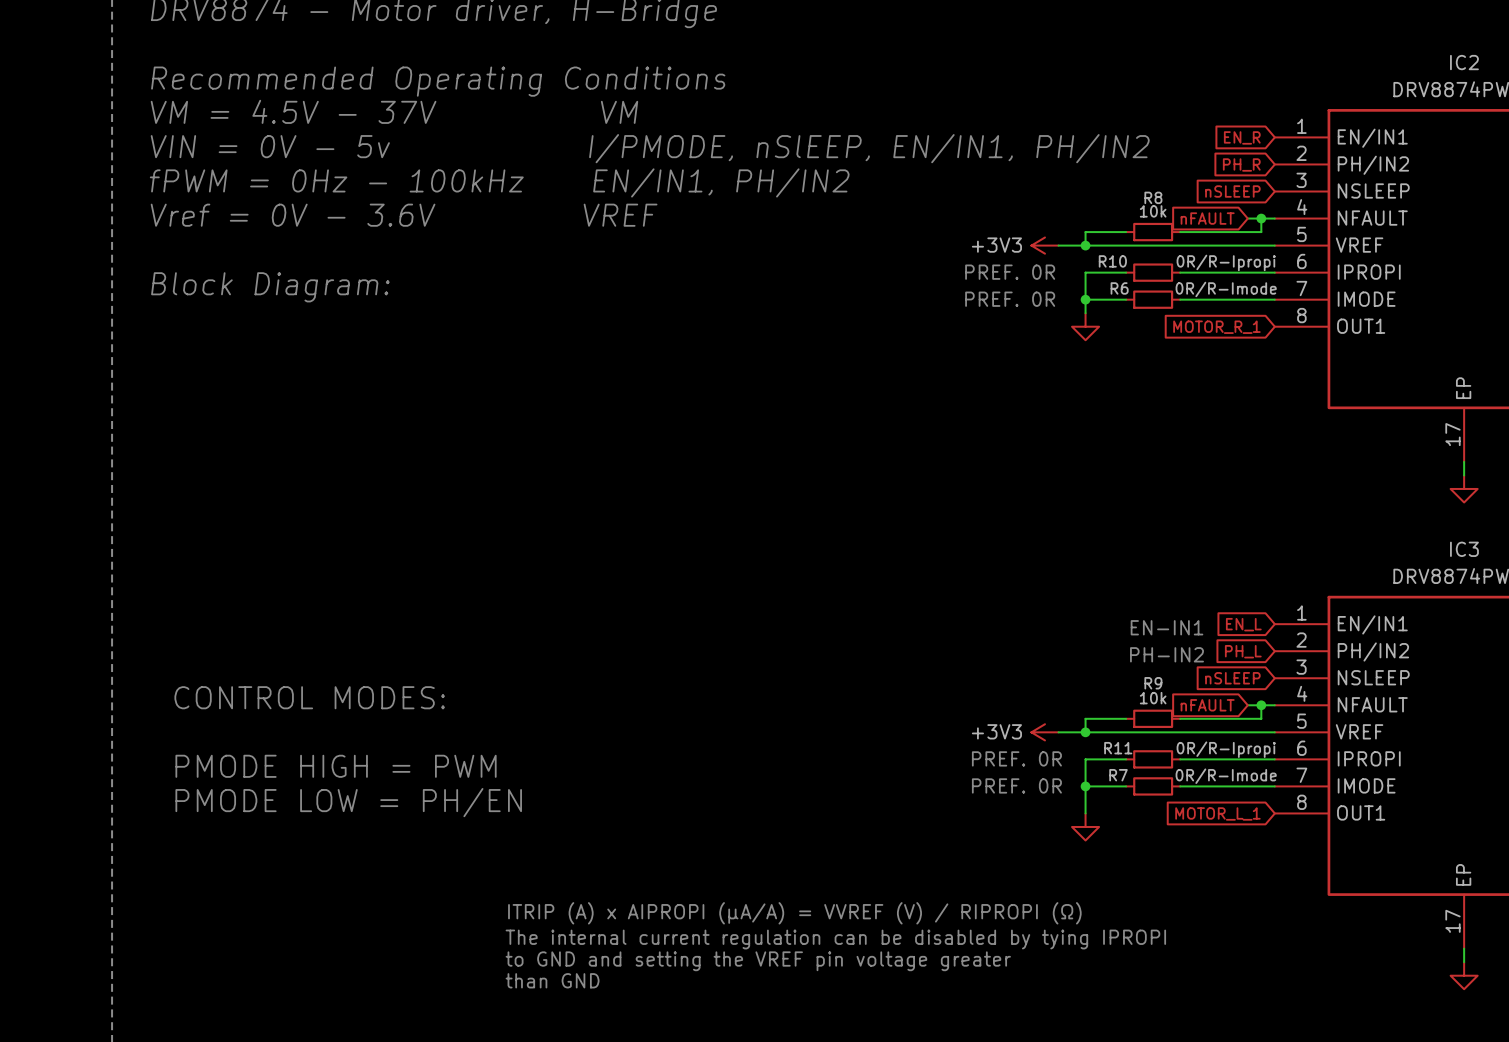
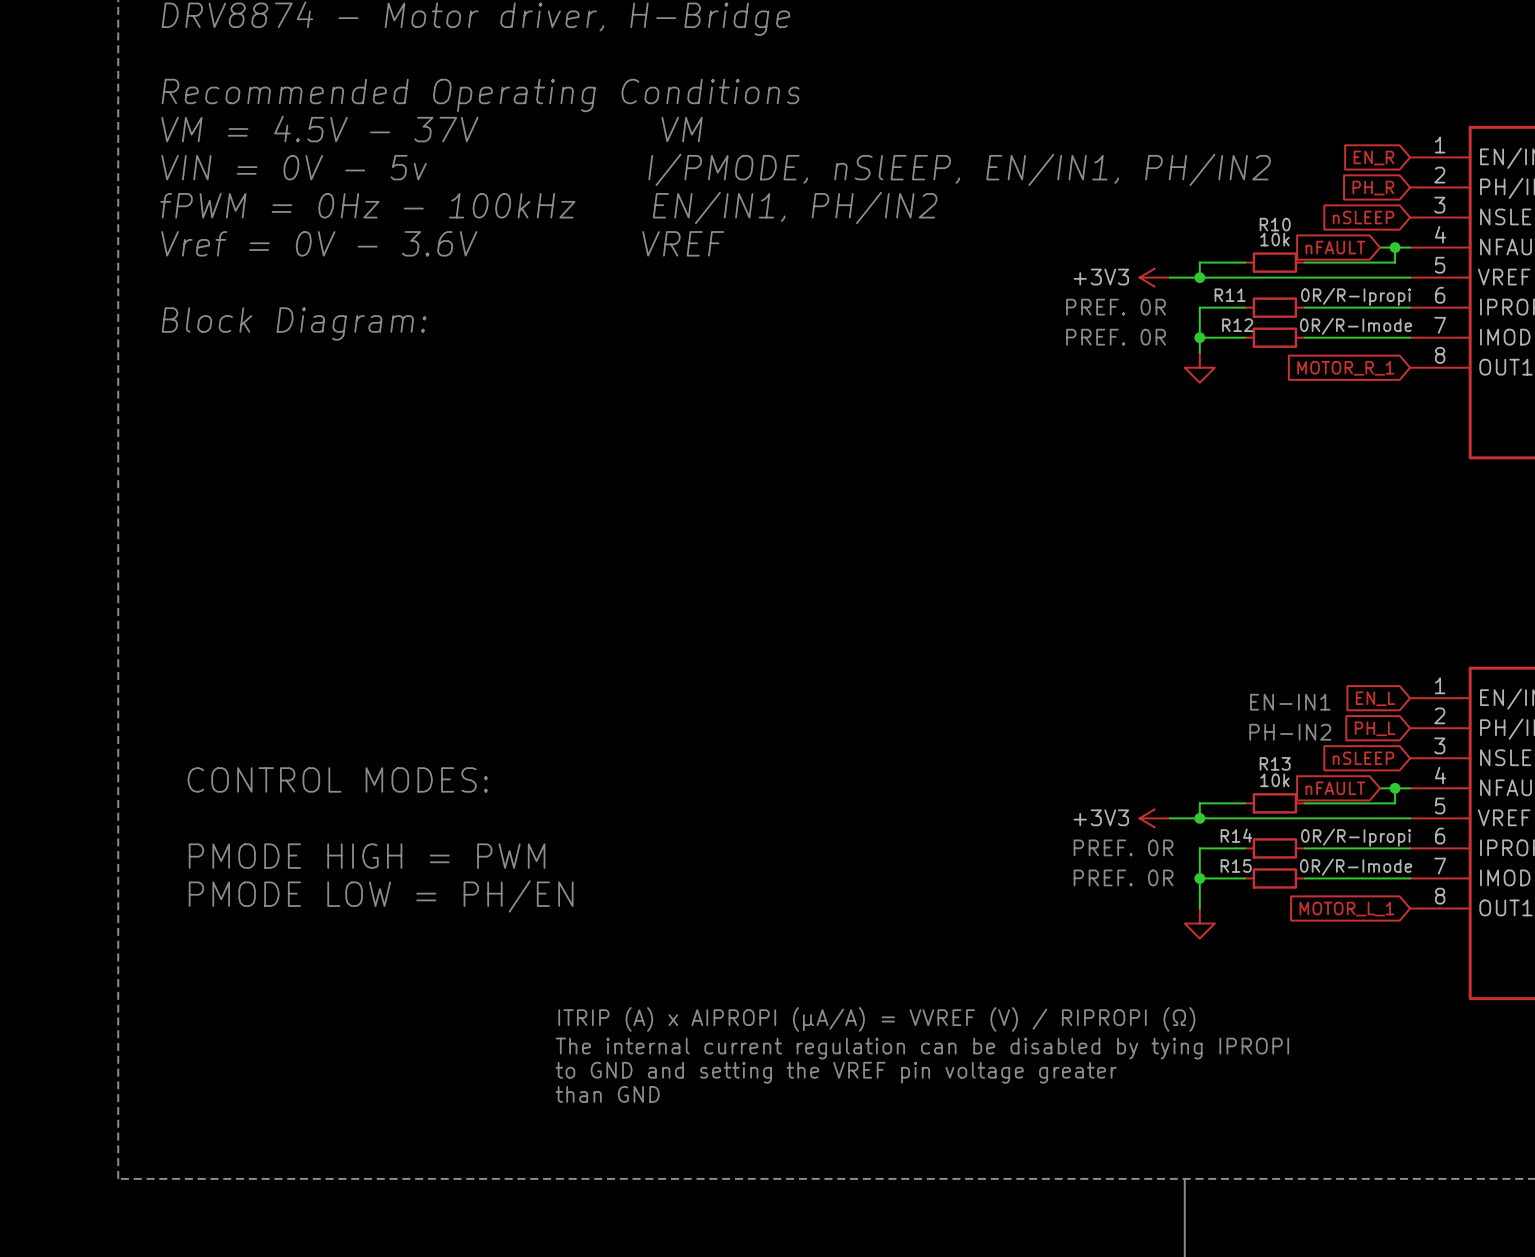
R8 name: R8 (1153, 197) -> R10 (1275, 224)
R10 name: R10 (1112, 261) -> R11 (1230, 295)
R6 name: R6 (1119, 288) -> R12 (1237, 325)
R9 name: R9 (1153, 683) -> R13 (1275, 763)
R11 name: R11 (1118, 748) -> R14 (1236, 835)
R7 name: R7 (1118, 775) -> R15 (1236, 866)

